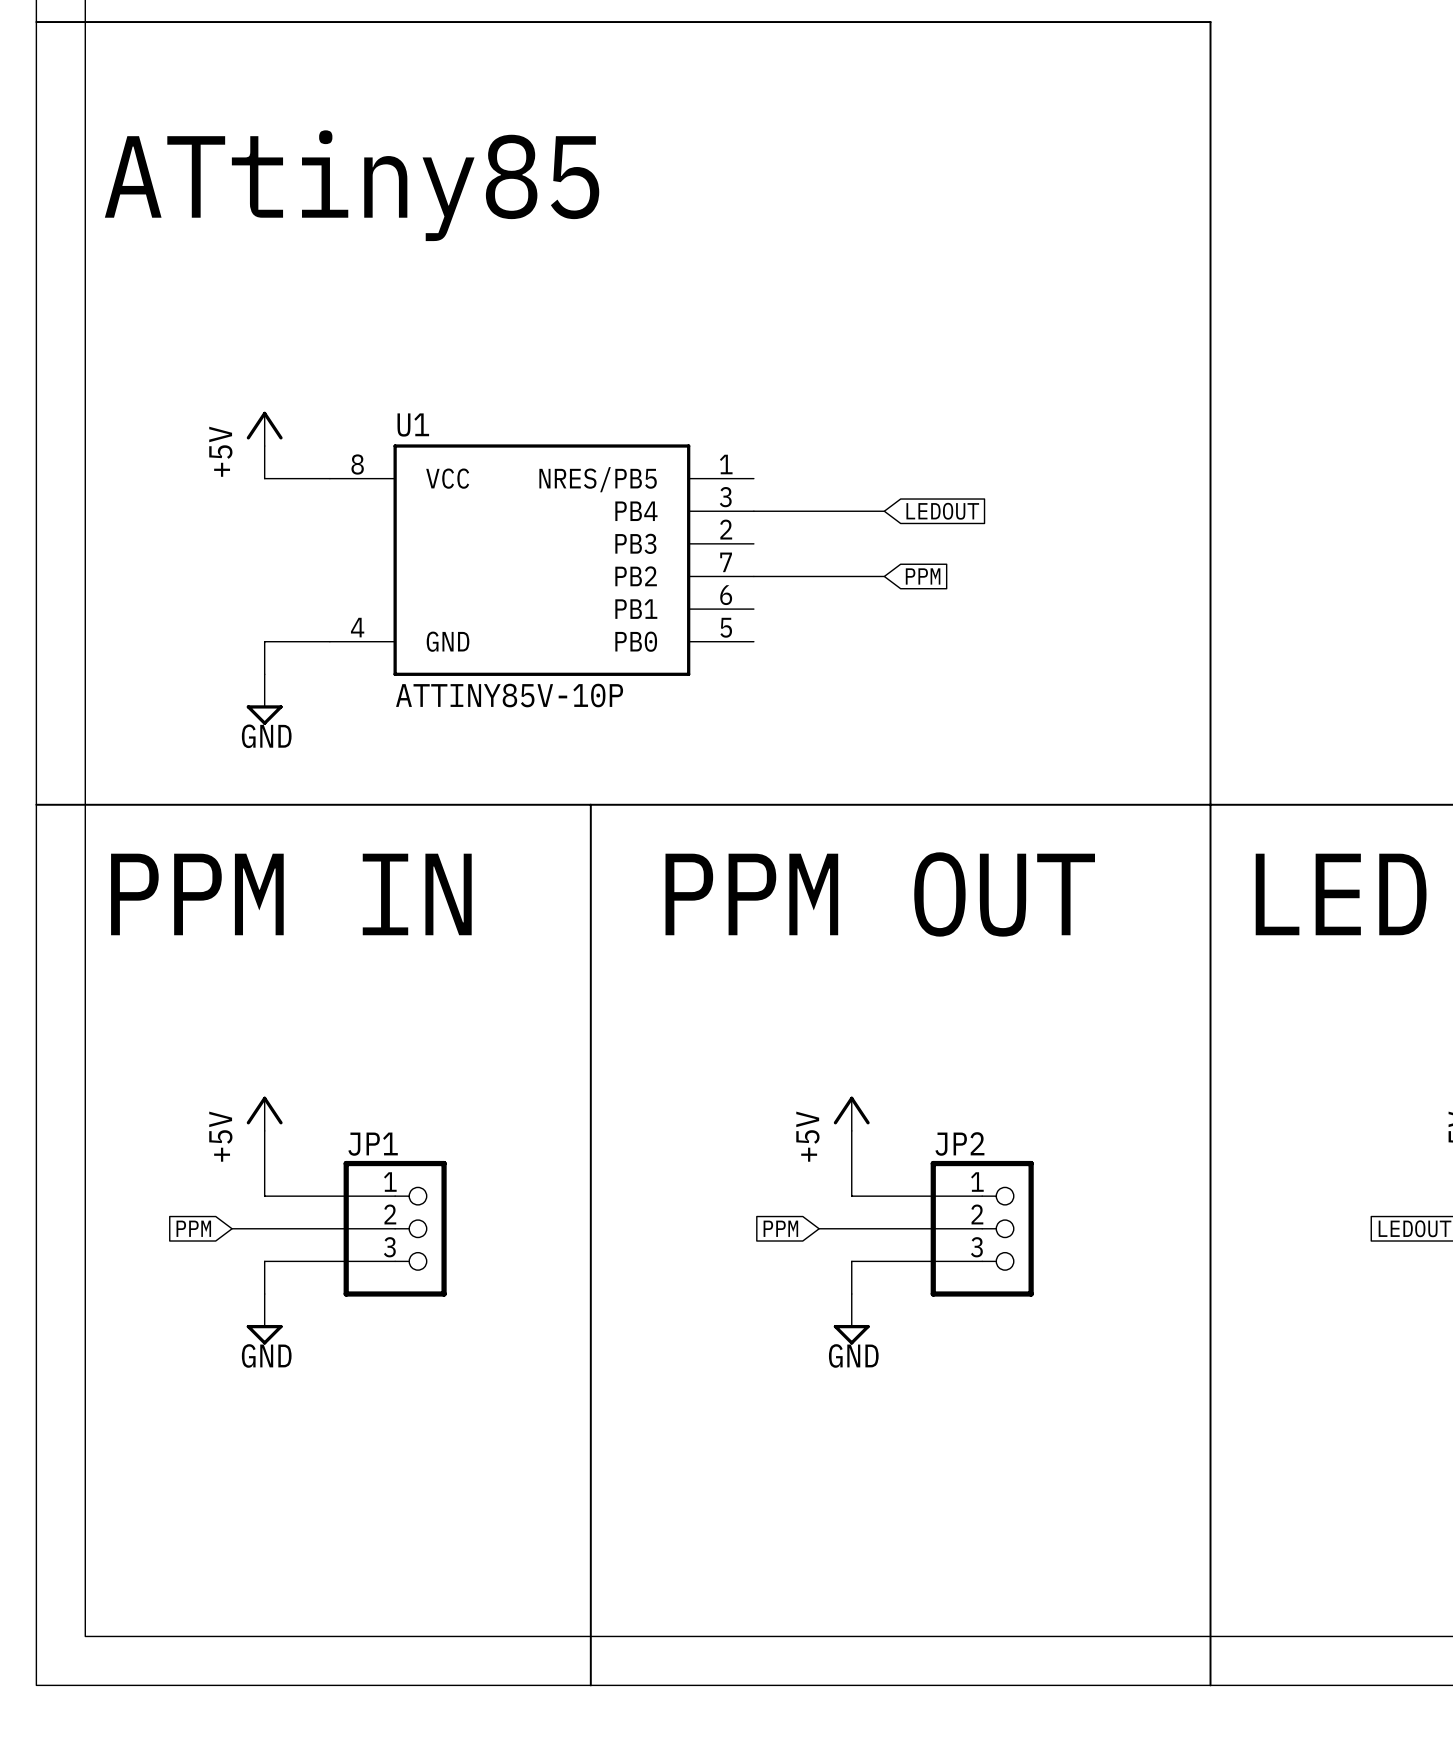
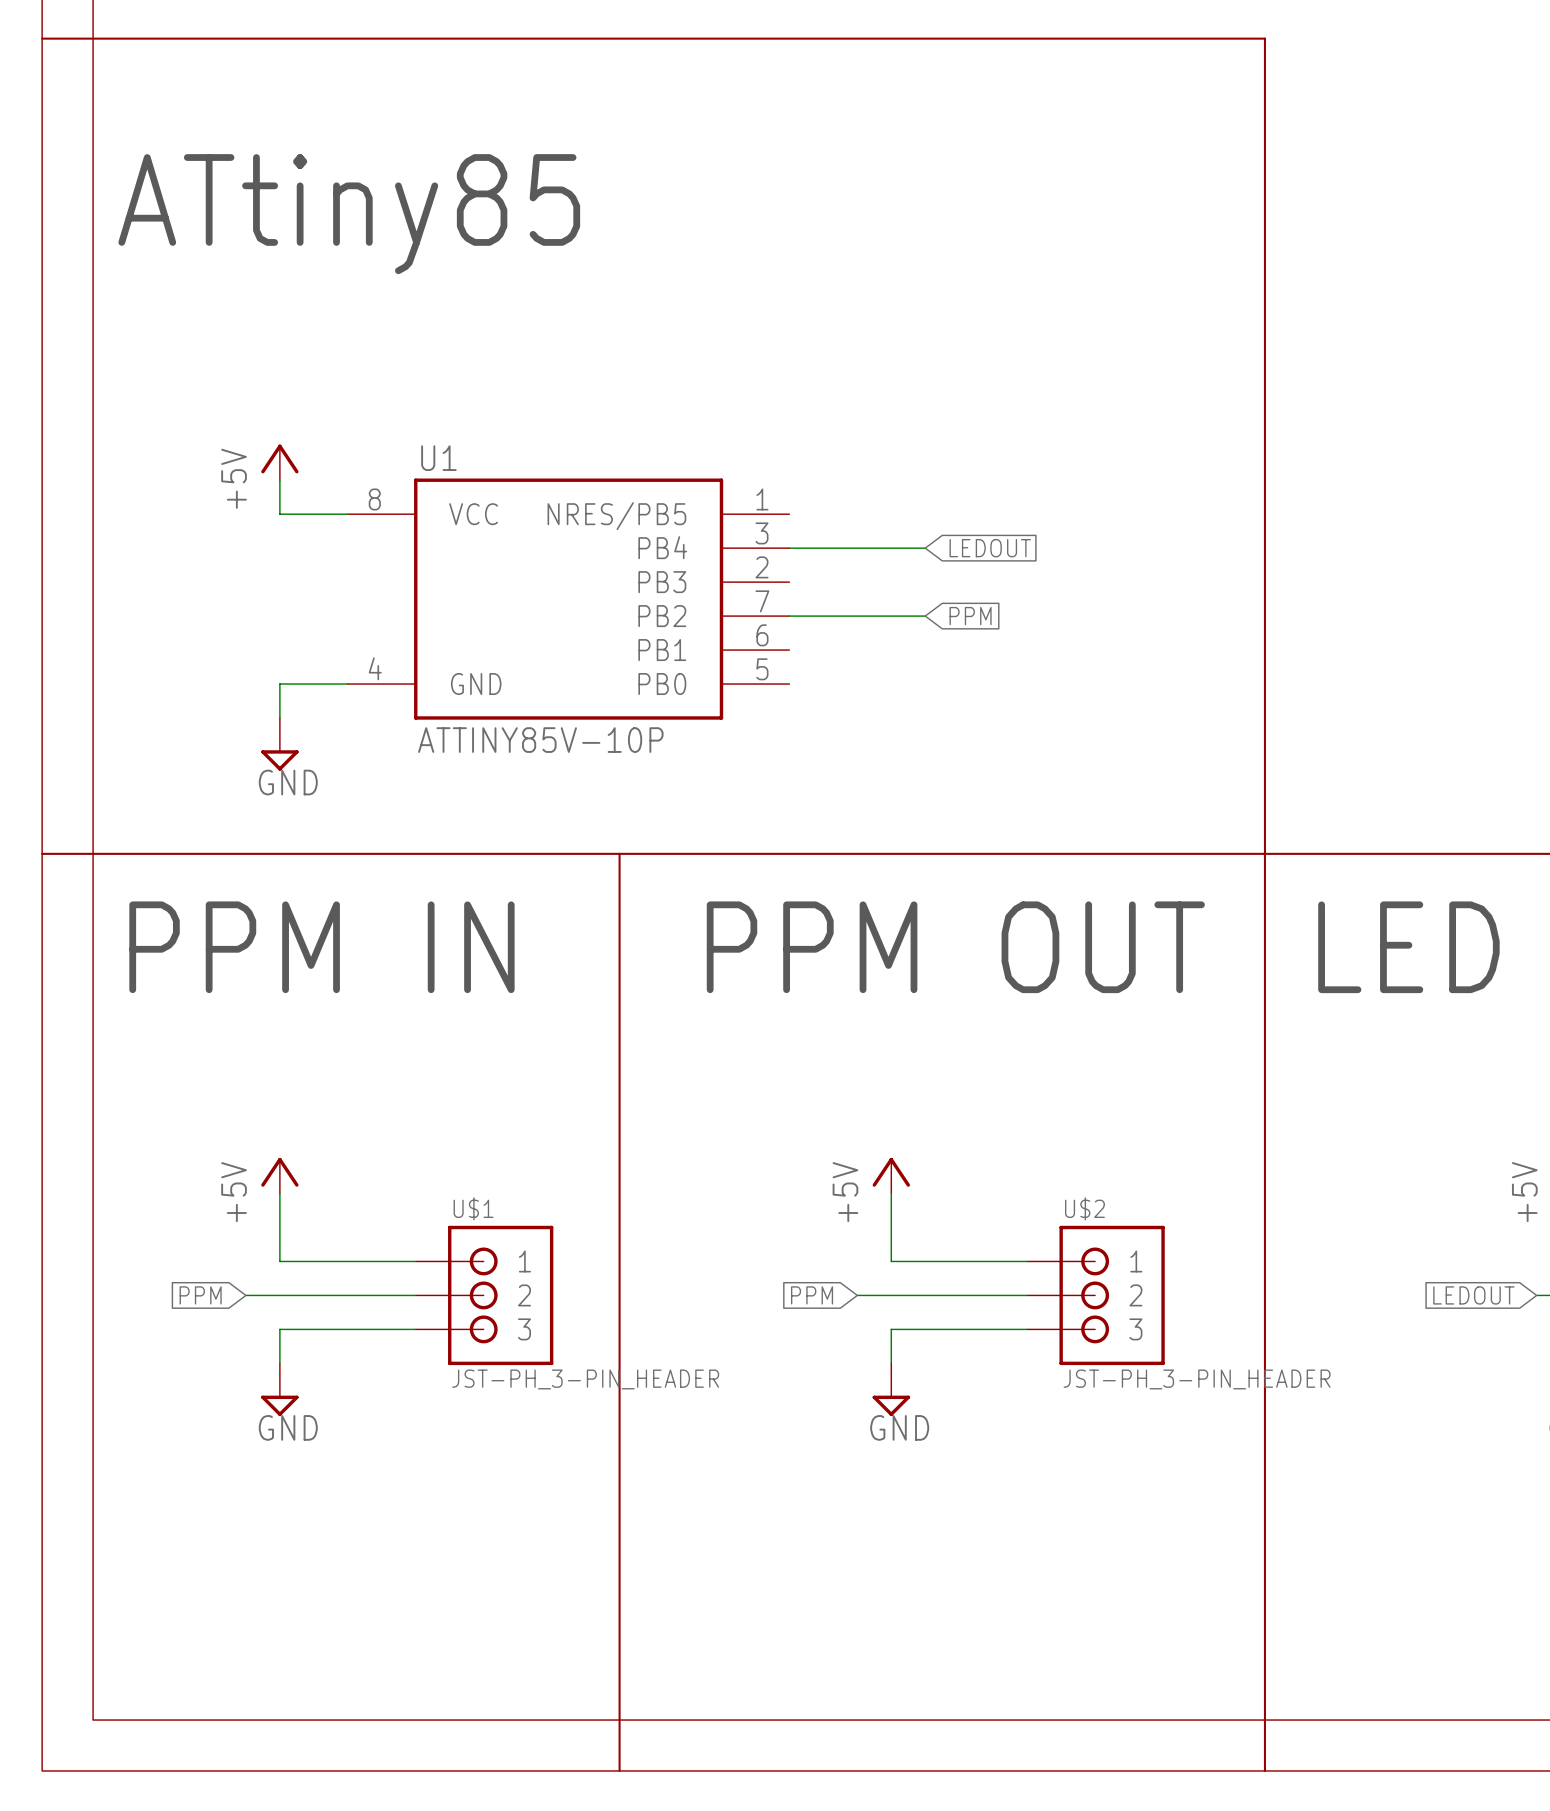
JP1: (395, 1228) -> none
U$1: none -> JST-PH_3-PIN_HEADER (484, 1295)
JP2: (982, 1228) -> none
U$2: none -> JST-PH_3-PIN_HEADER (1095, 1295)

